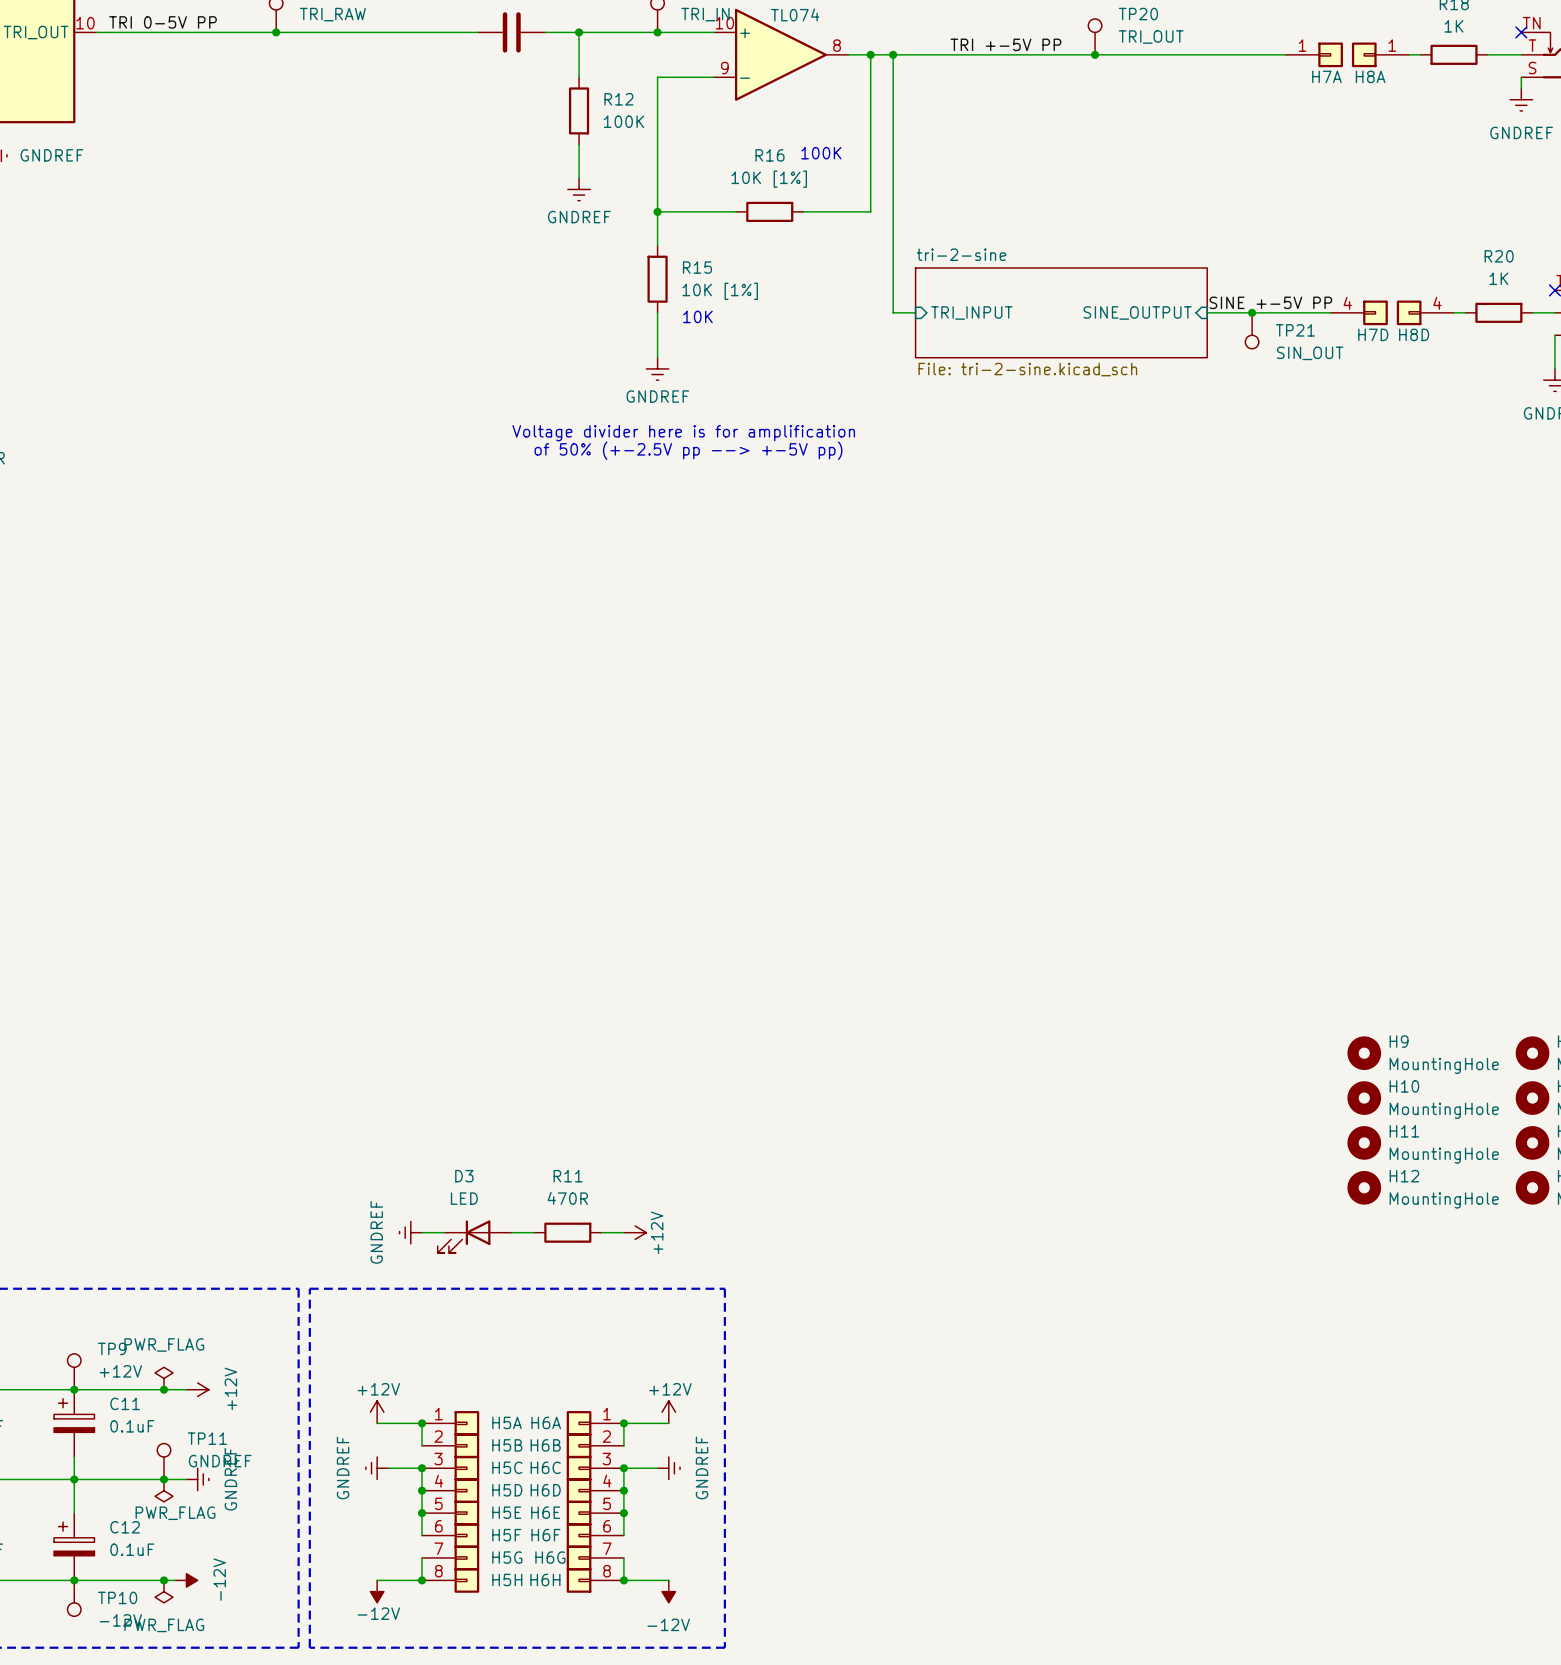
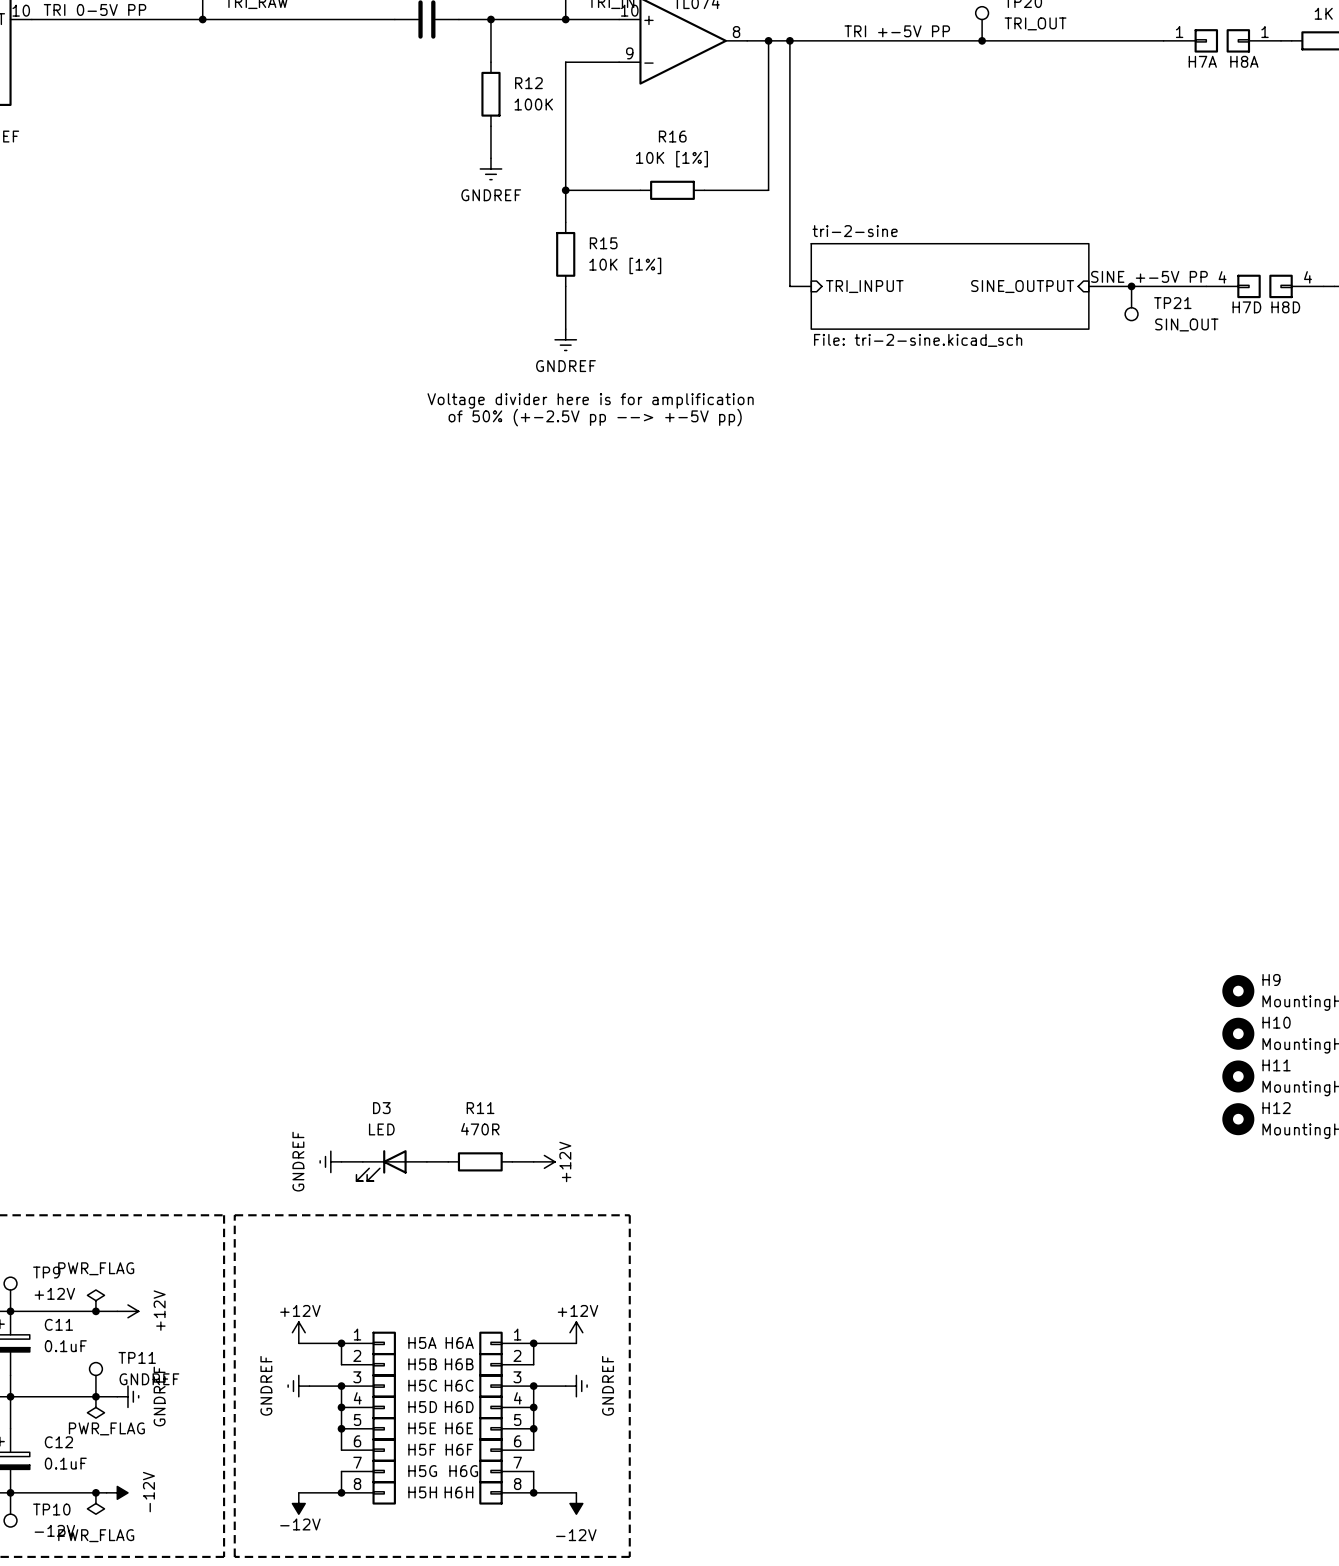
text: 100K (821, 153) -> none
text: 10K (697, 316) -> none

